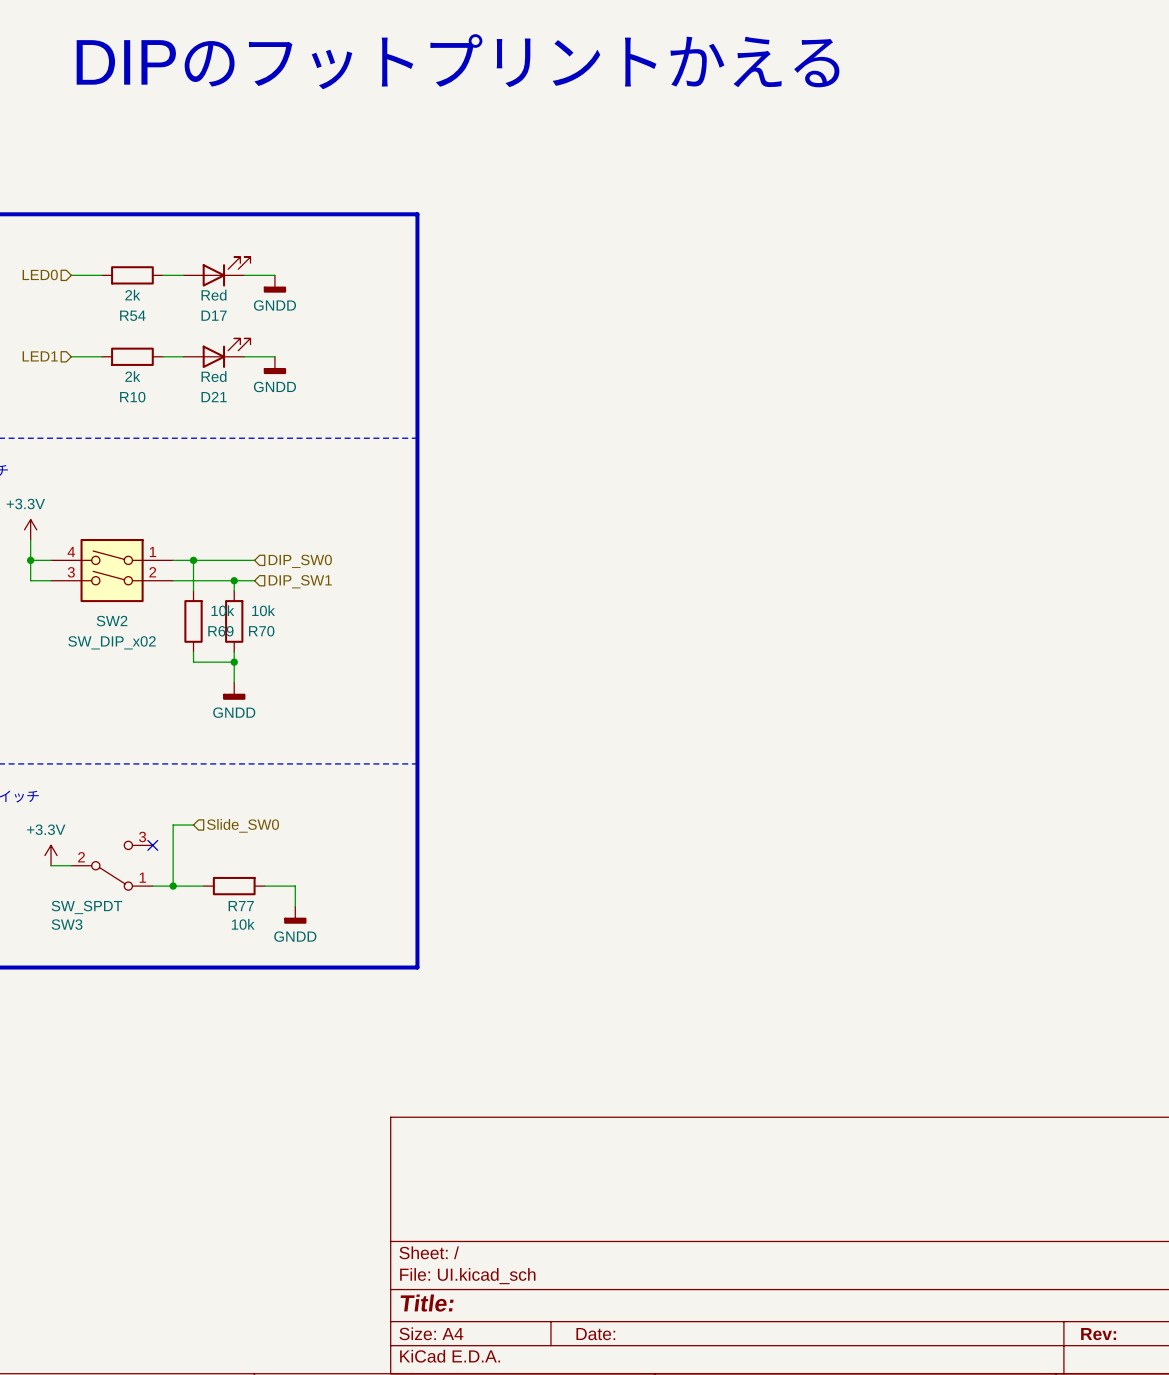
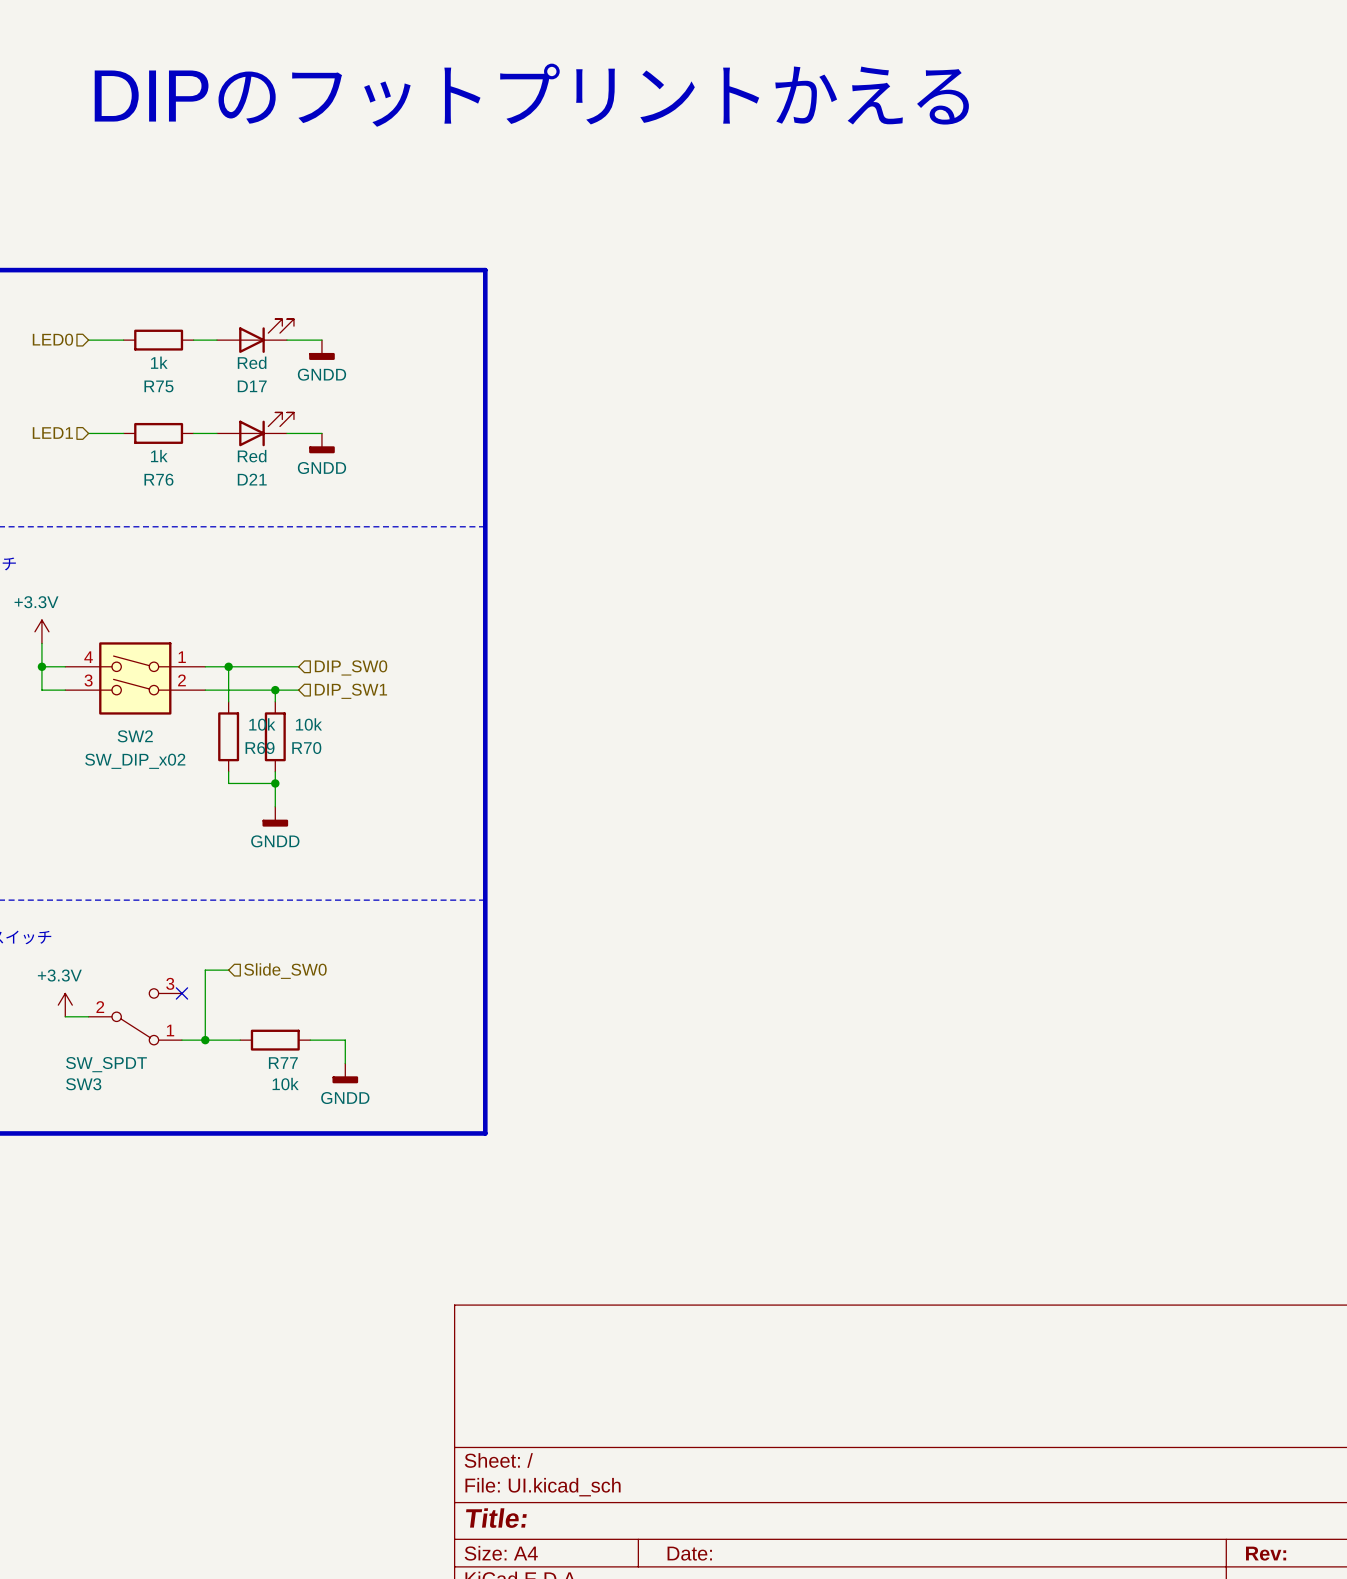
R54 value: 2k (132, 295) -> 1k (159, 362)
R54 name: R54 (132, 315) -> R75 (158, 386)
R10 value: 2k (132, 376) -> 1k (159, 456)
R10 name: R10 (132, 397) -> R76 (158, 479)

